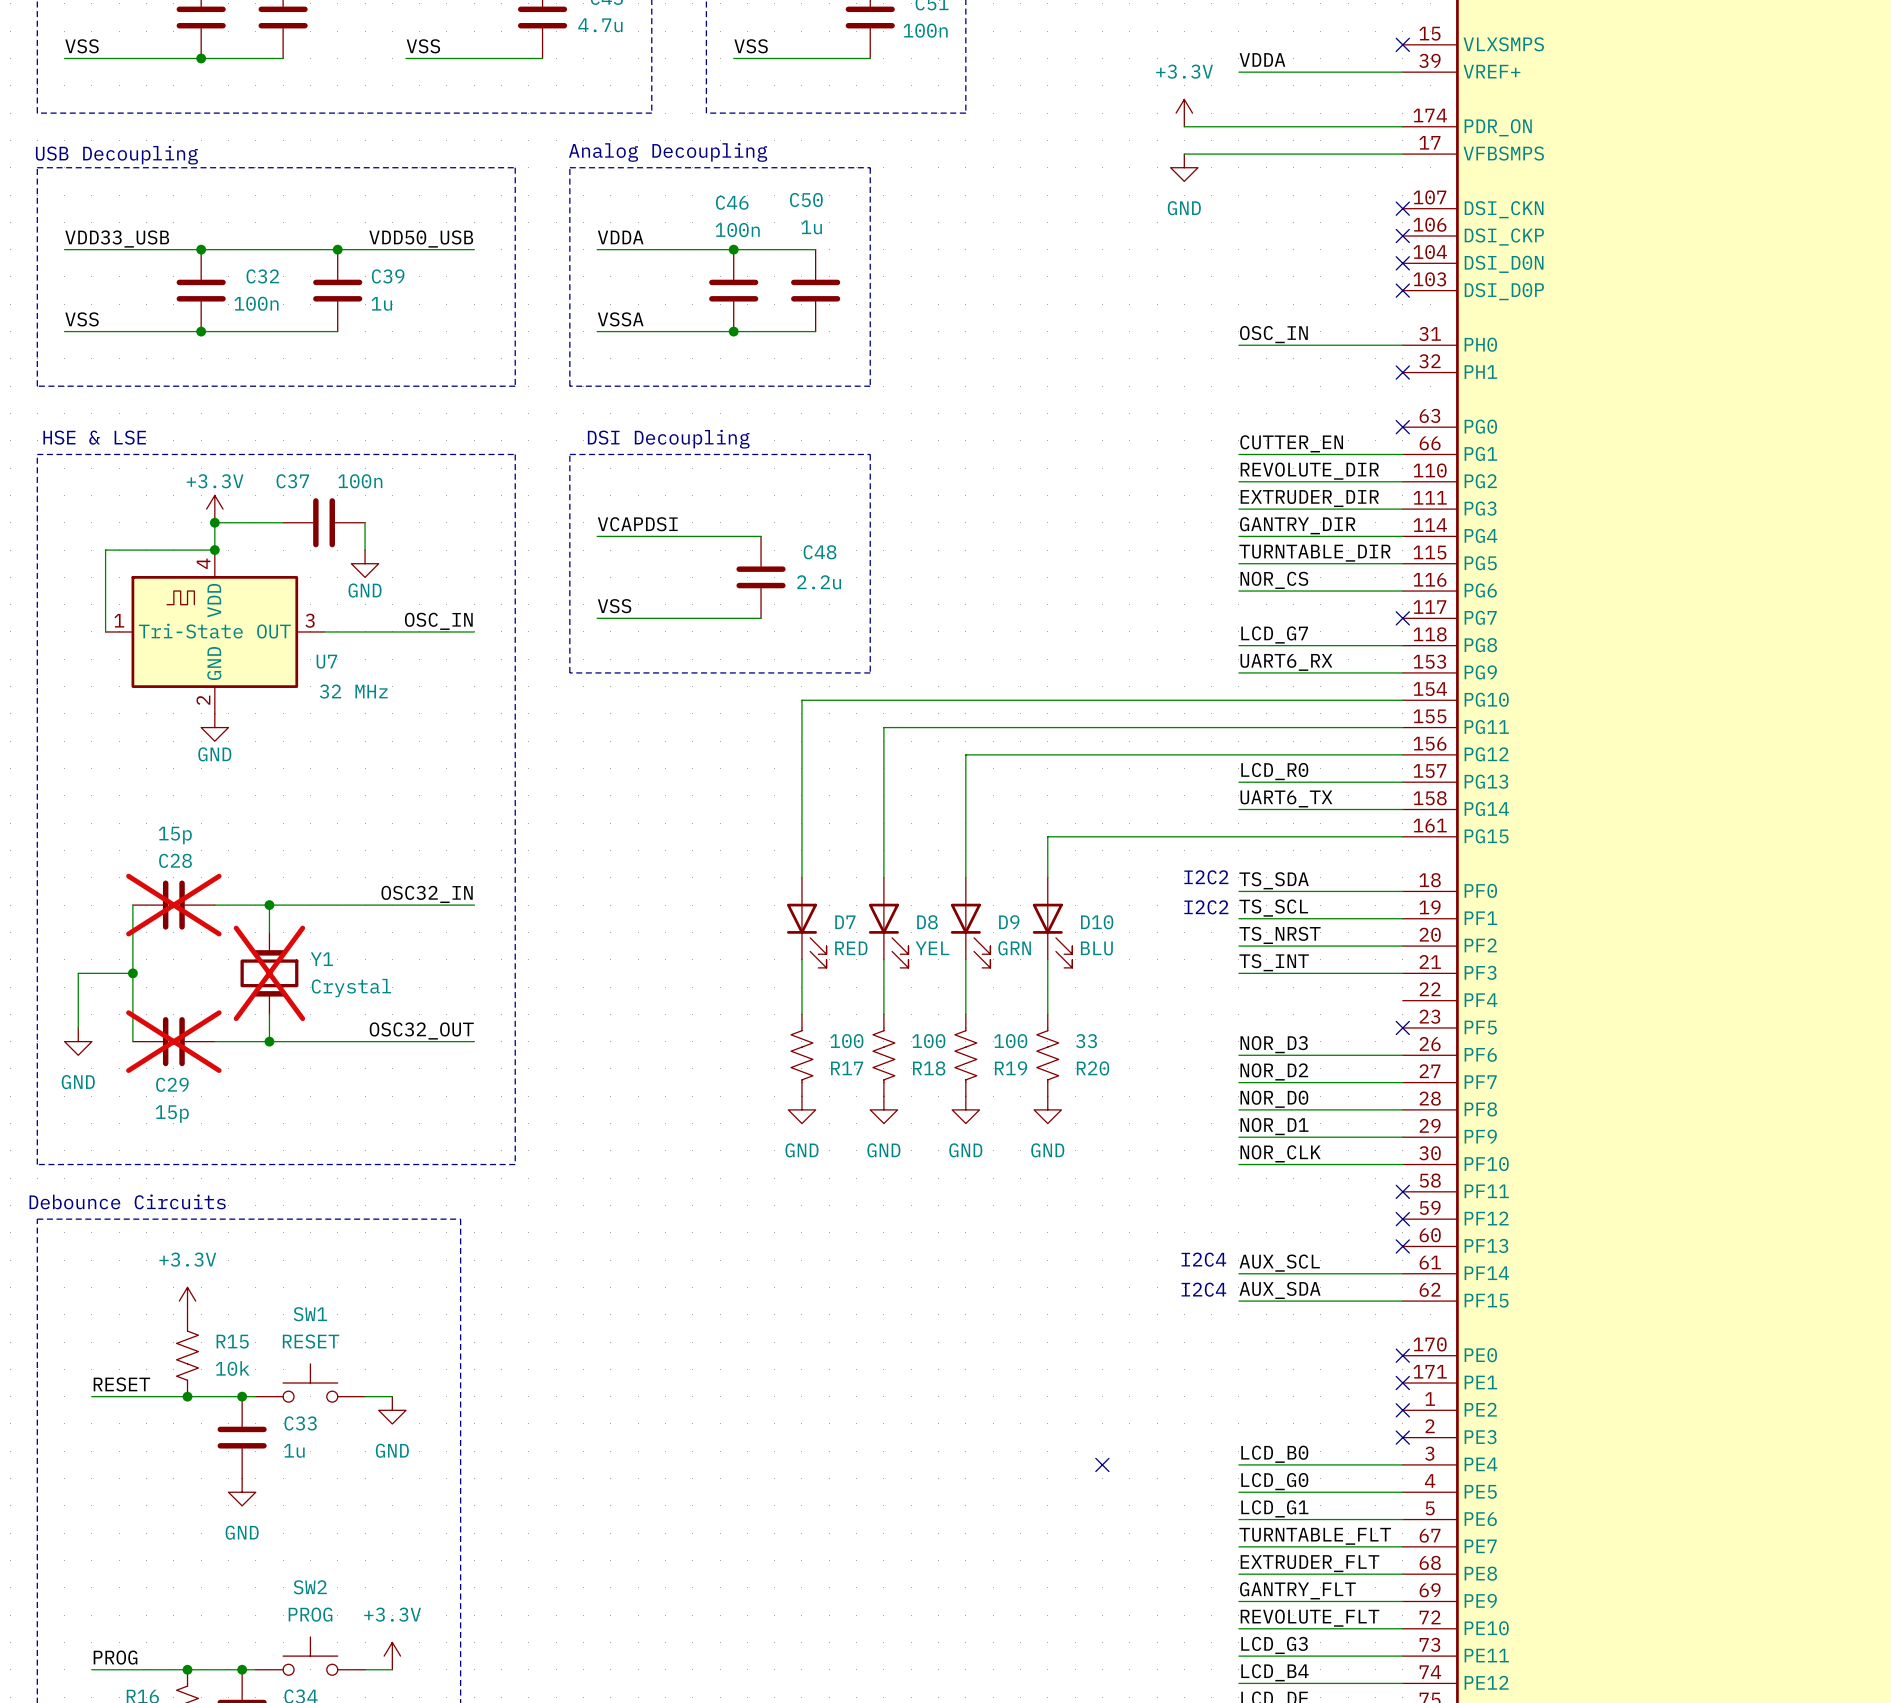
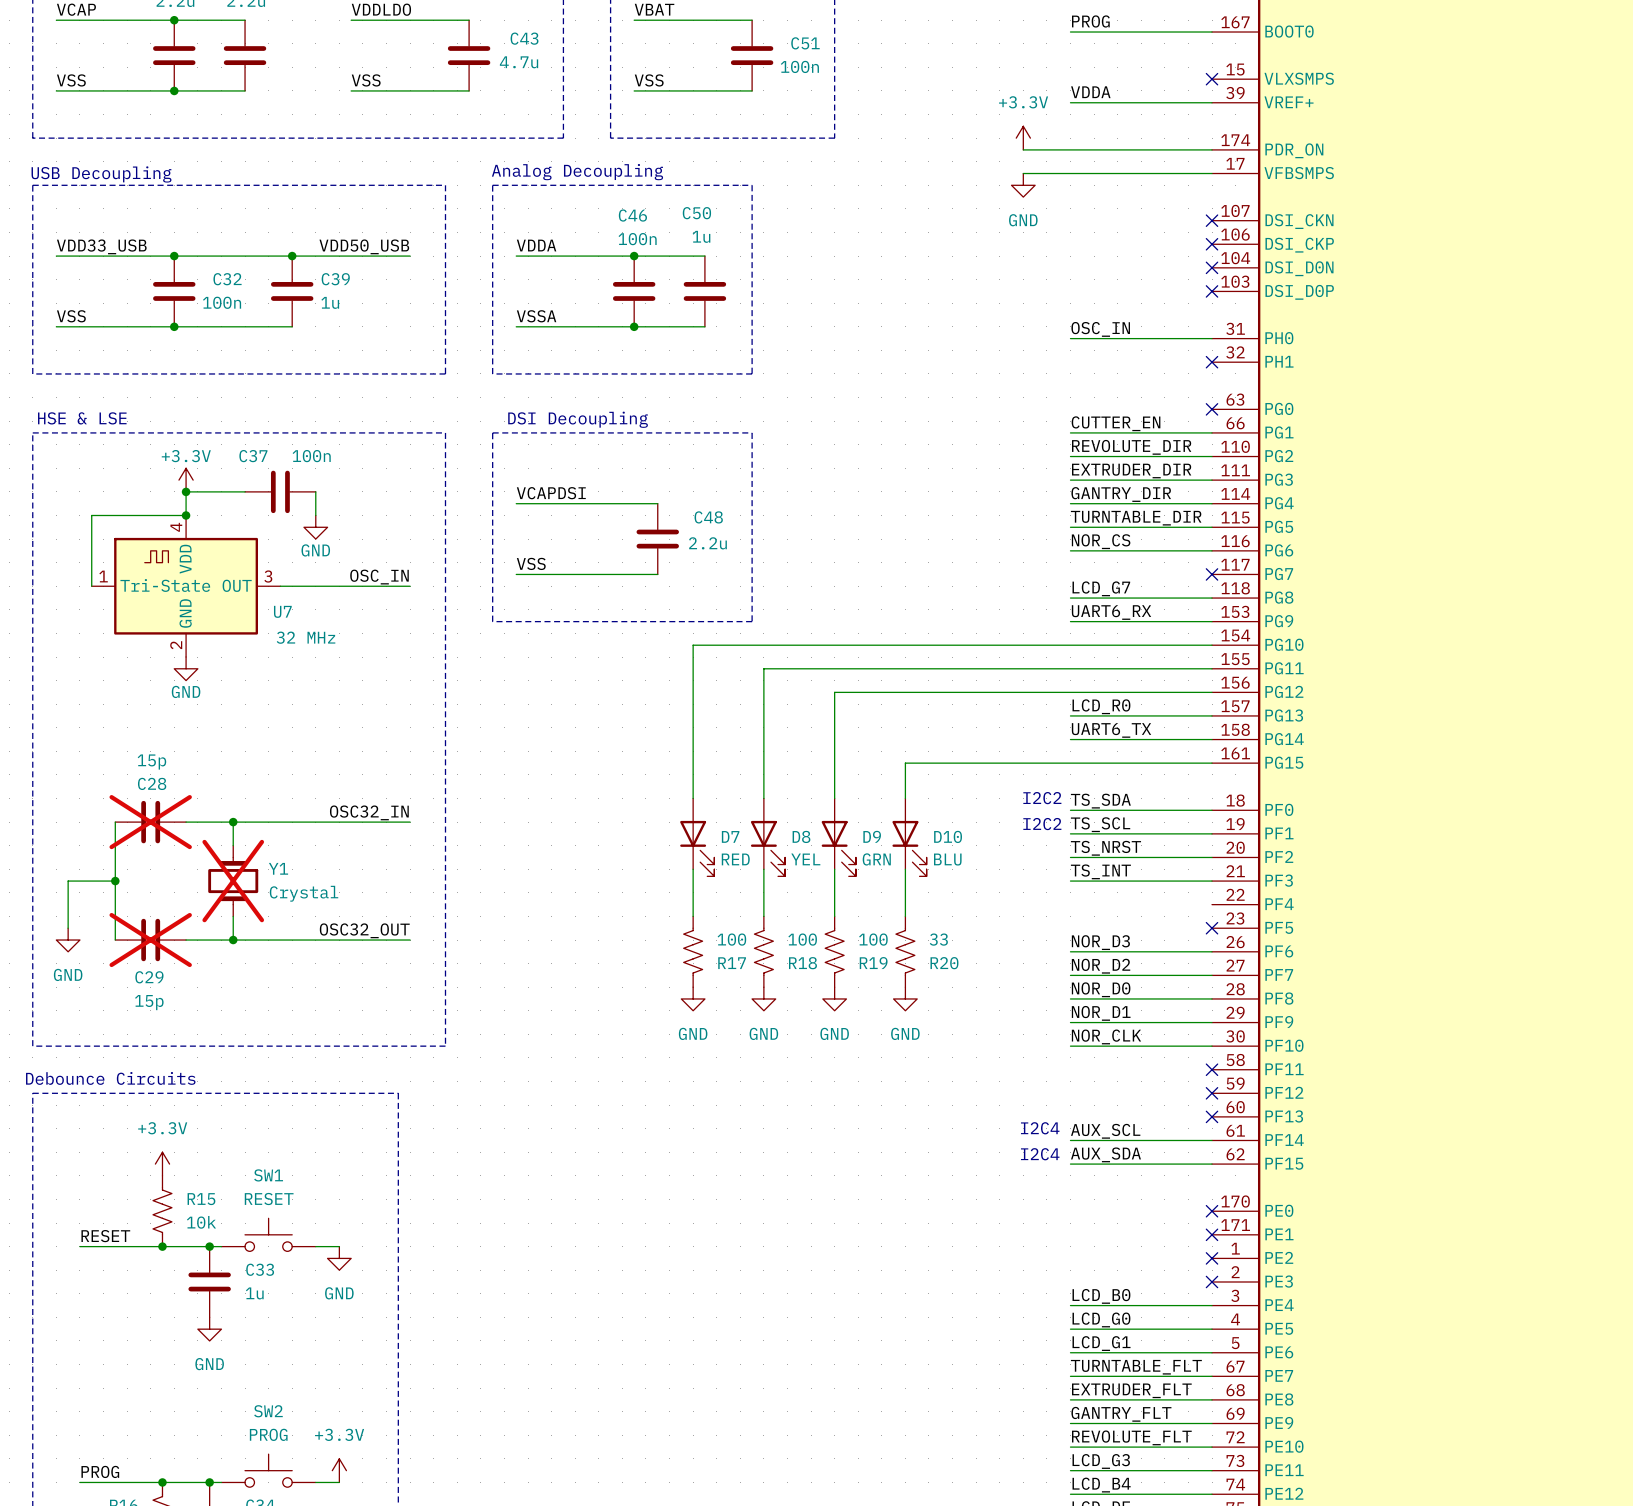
no-connect mark: (1102, 1464) -> none

